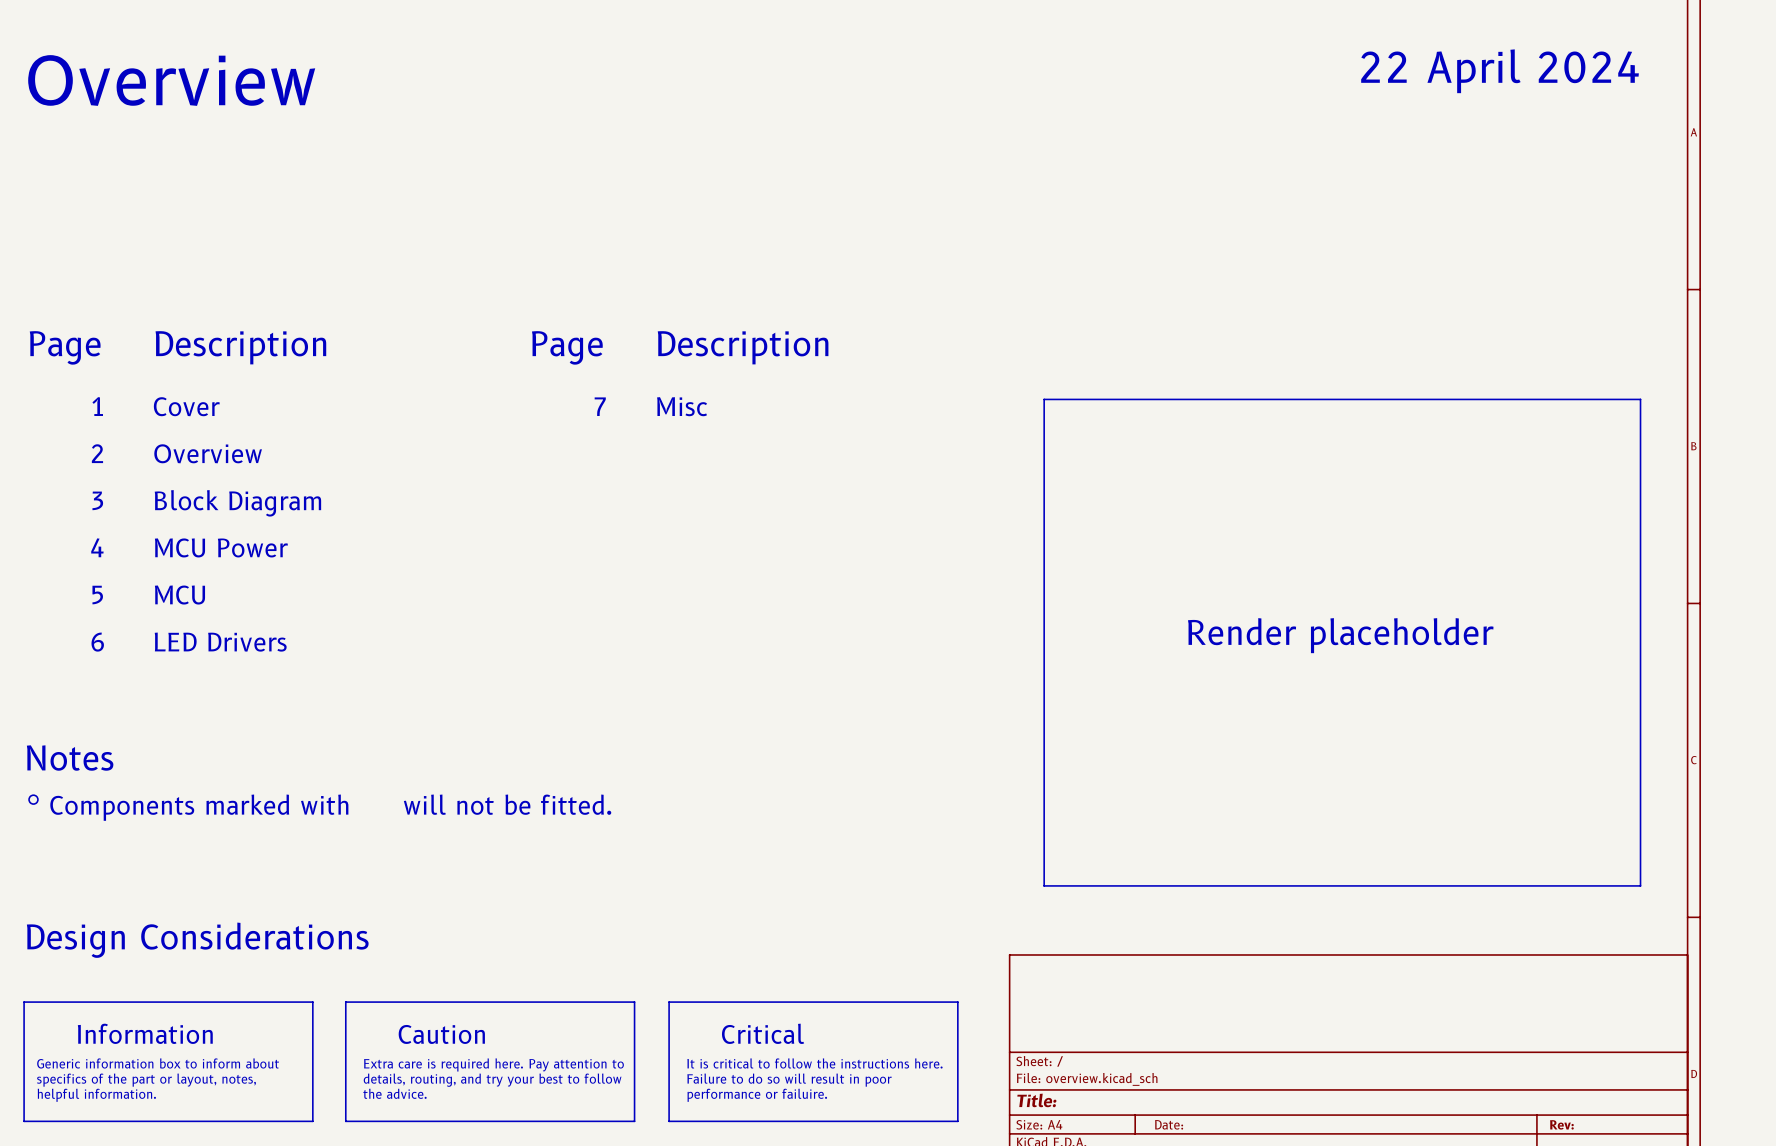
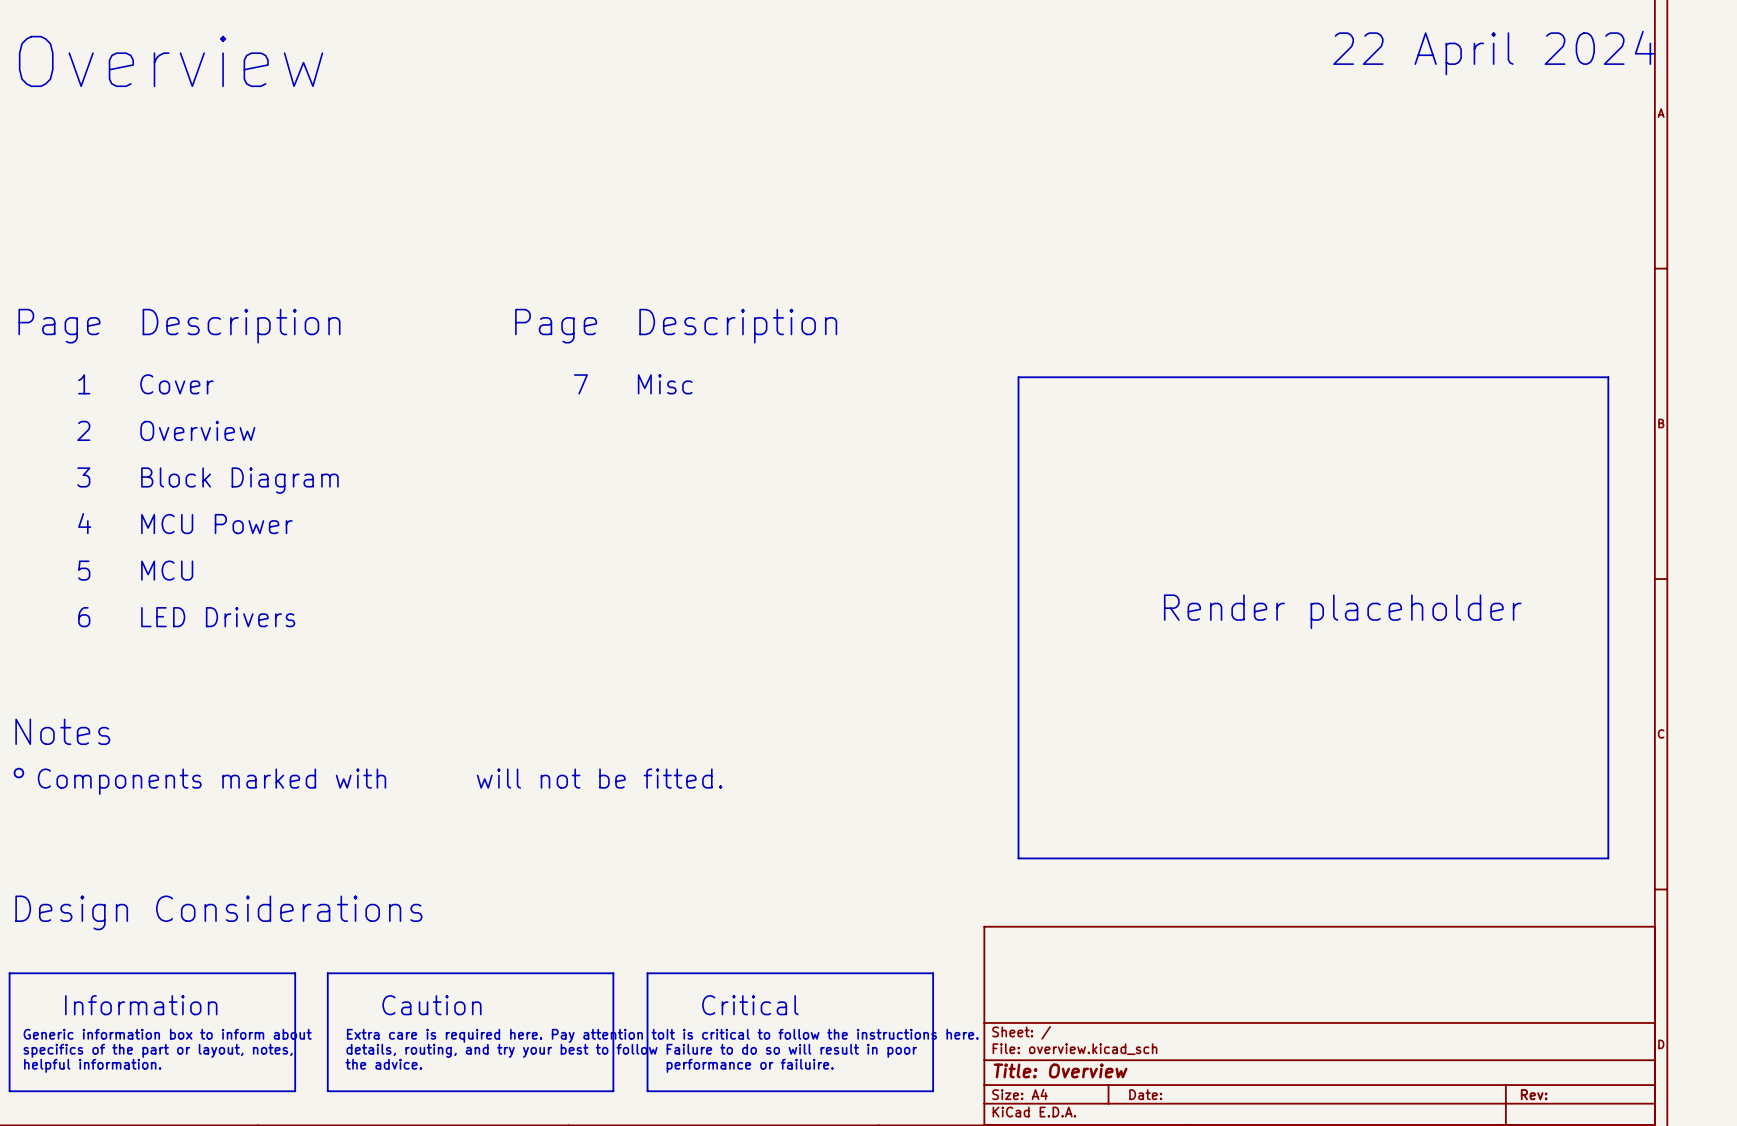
title block: Title: (1036, 1100) -> Title: Overview (1060, 1070)

